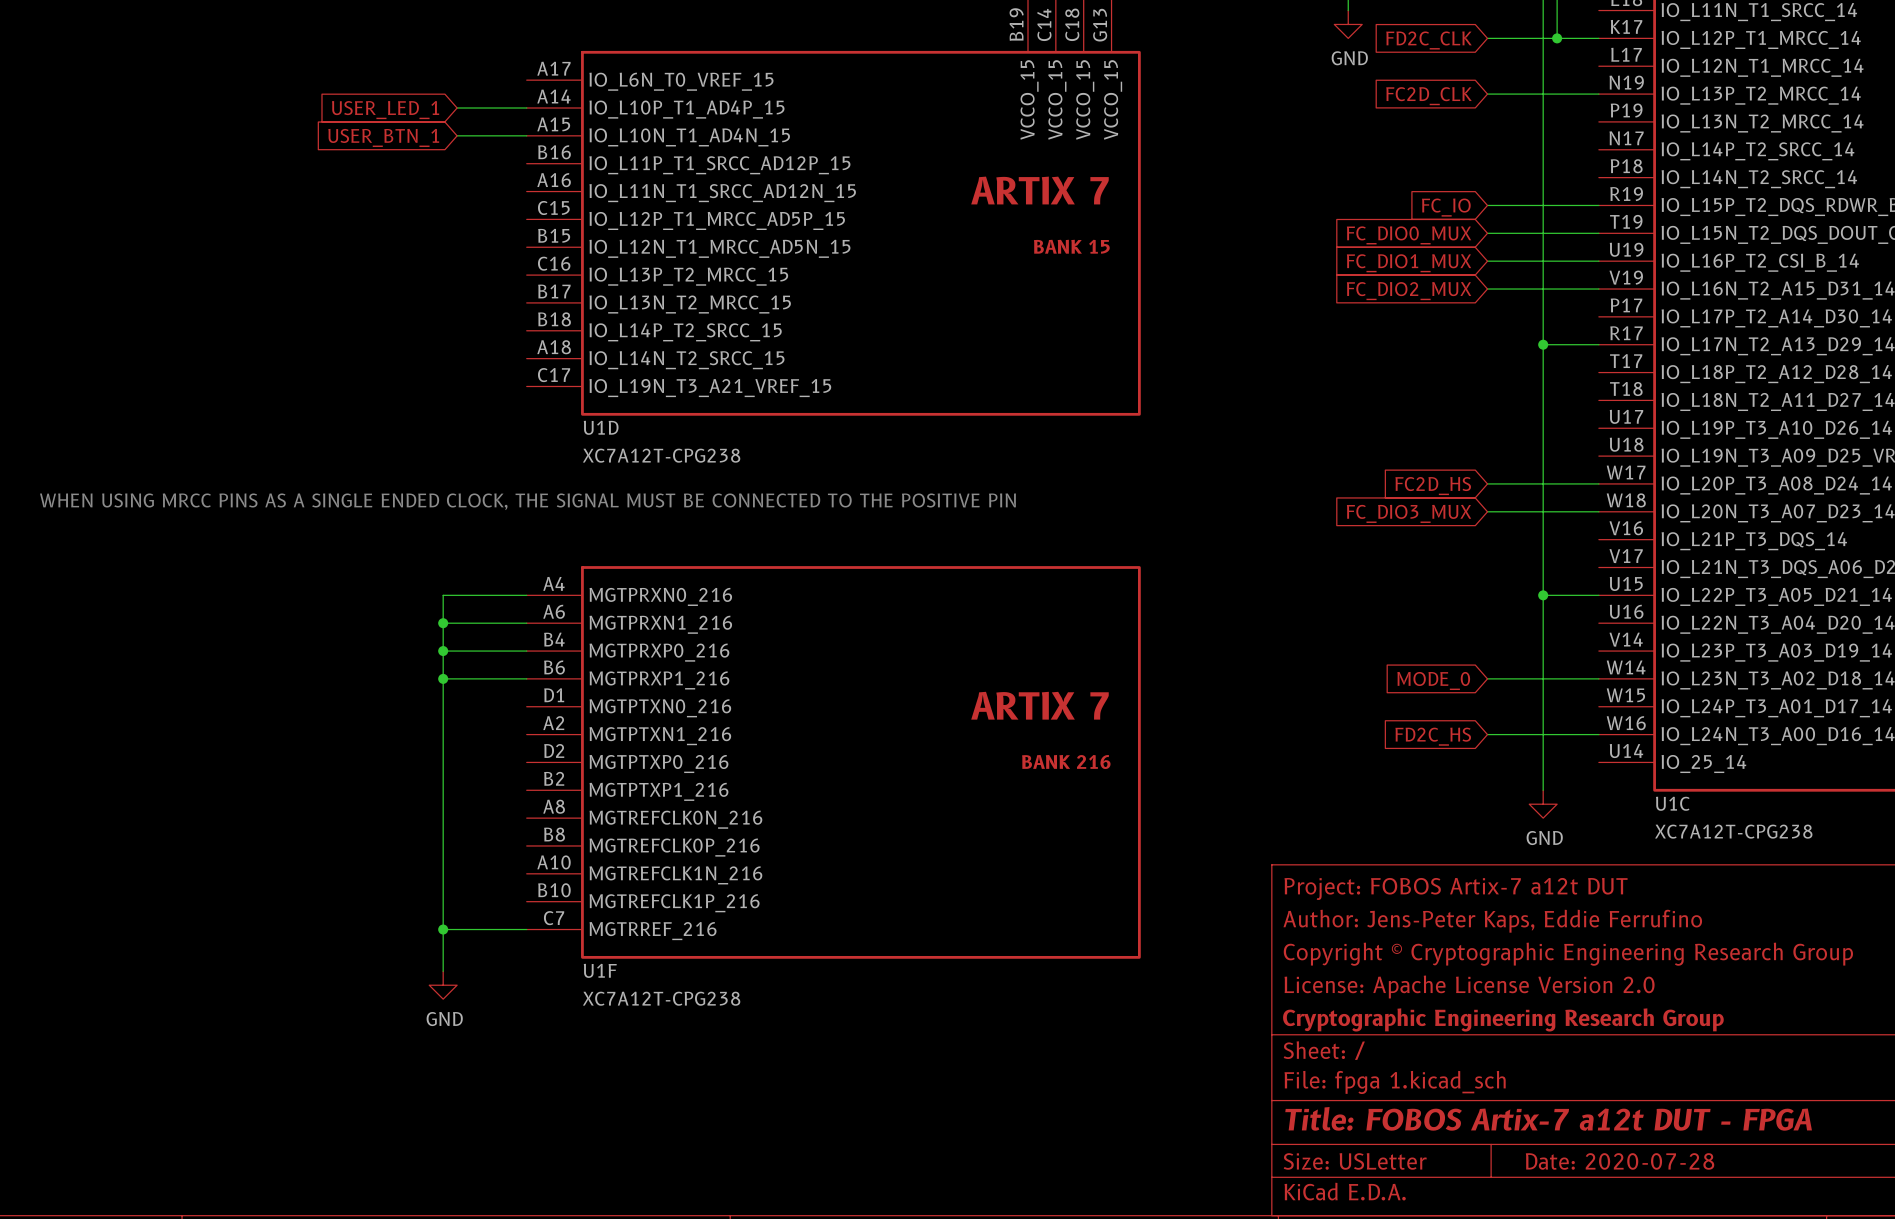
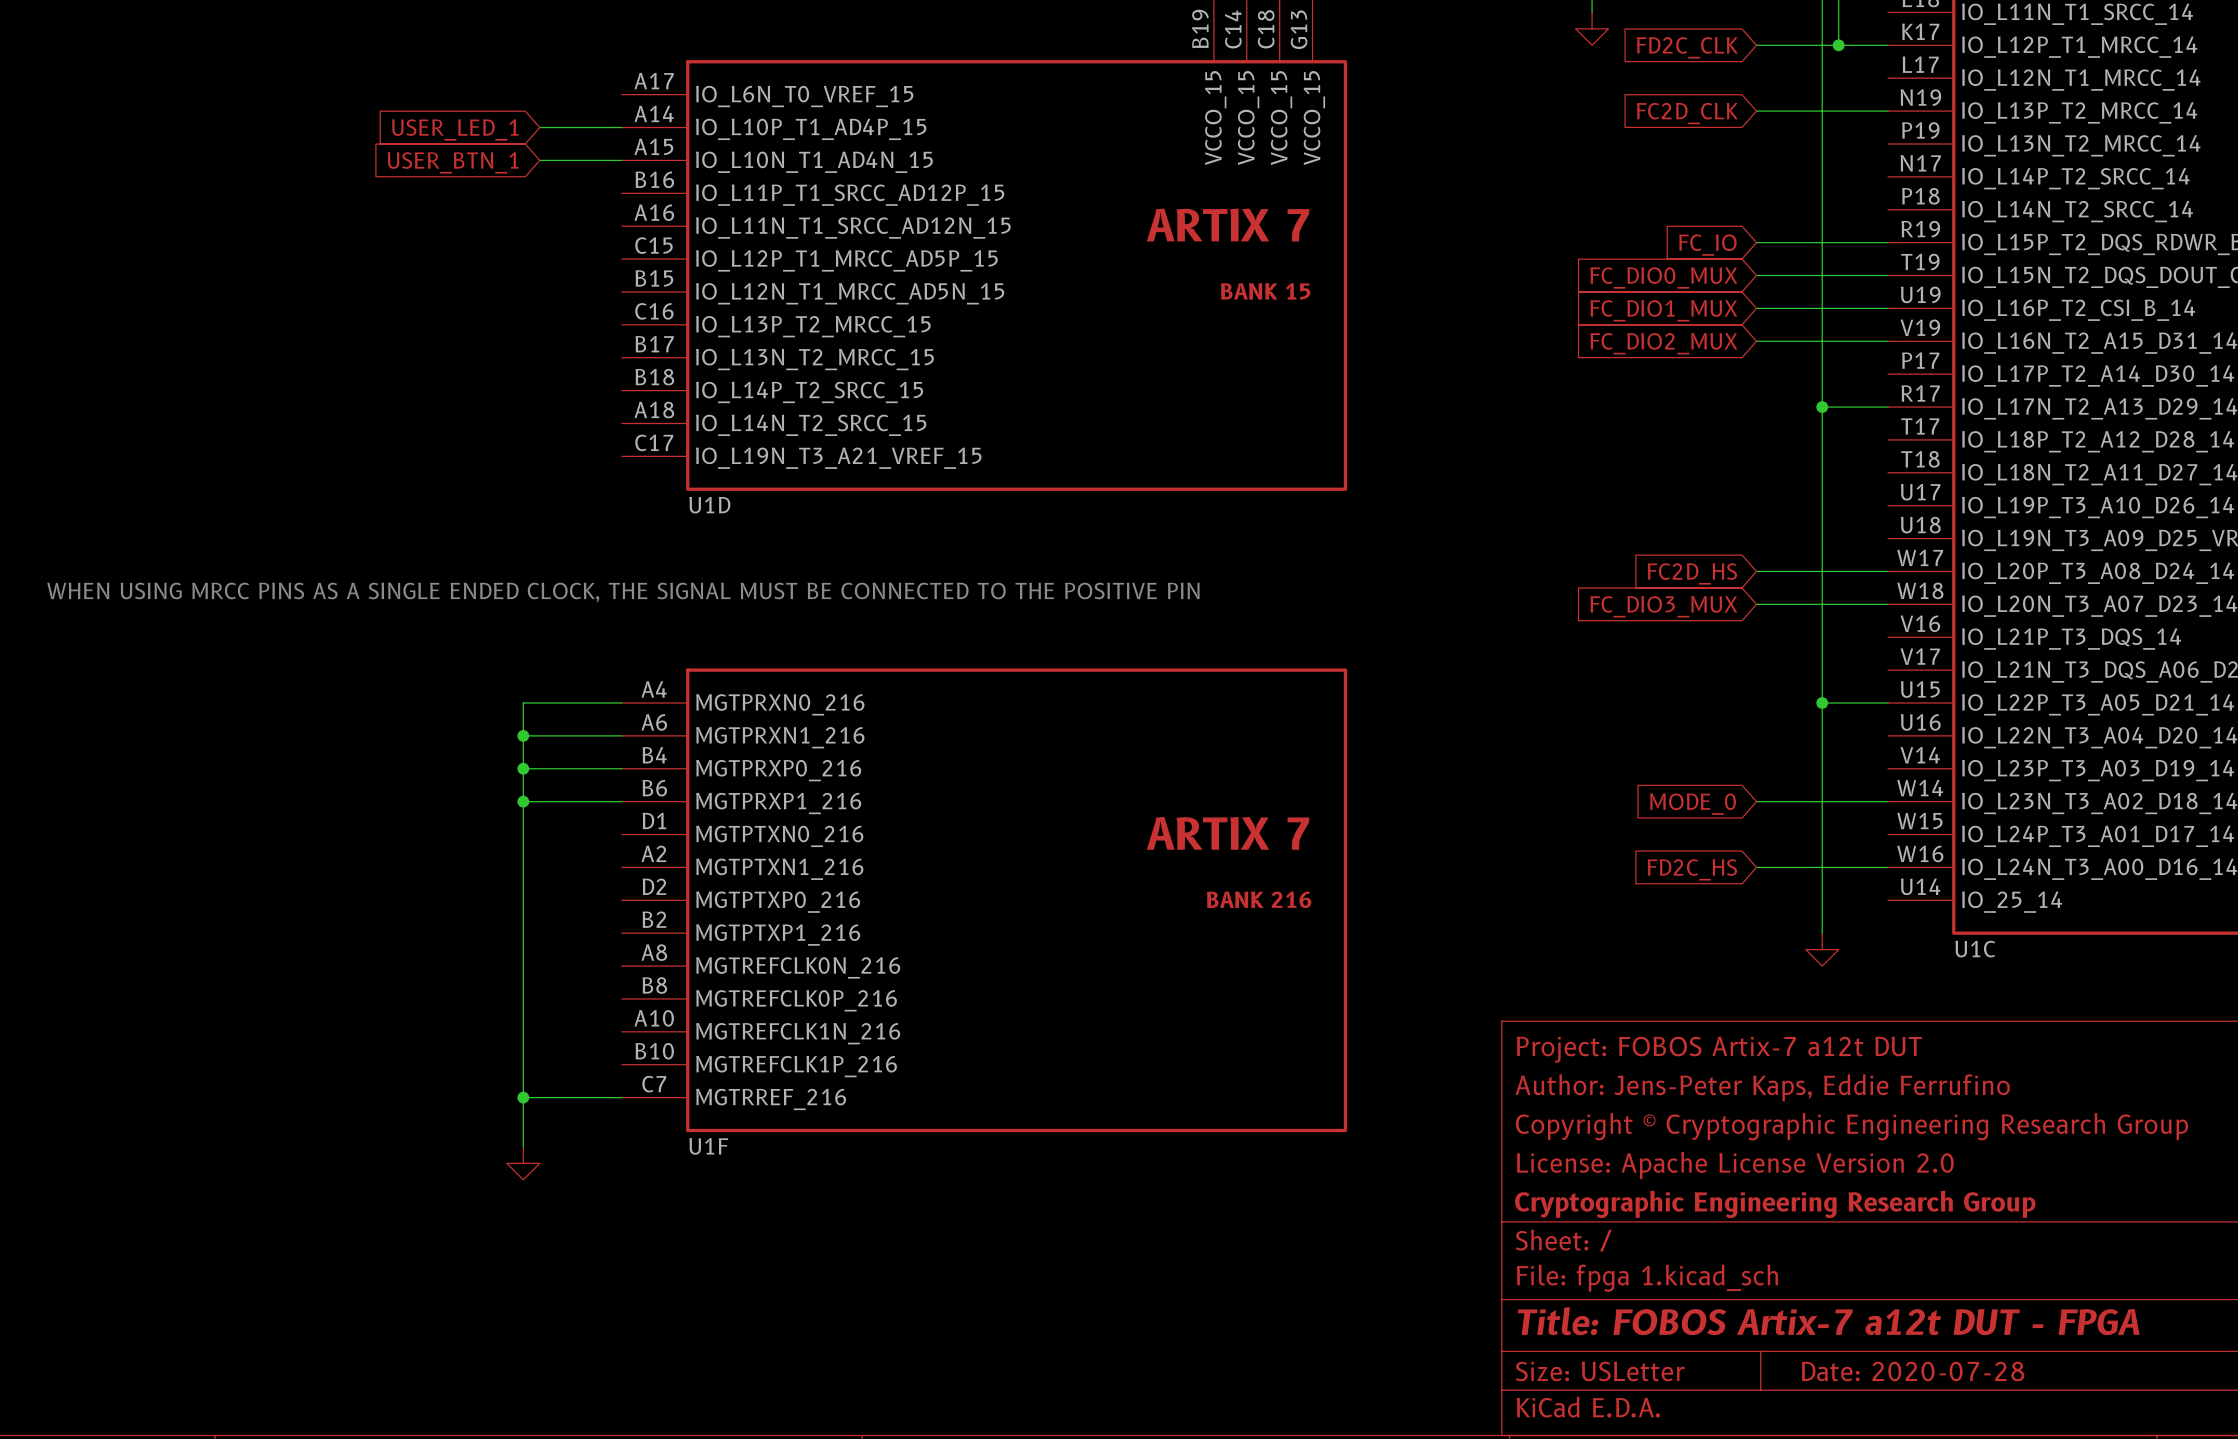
power symbol text: GND (1349, 58) -> none
U1D value: XC7A12T-CPG238 (661, 455) -> none
U1C value: XC7A12T-CPG238 (1733, 831) -> none
power symbol text: GND (1544, 838) -> none
U1F value: XC7A12T-CPG238 (661, 998) -> none
power symbol text: GND (444, 1019) -> none

